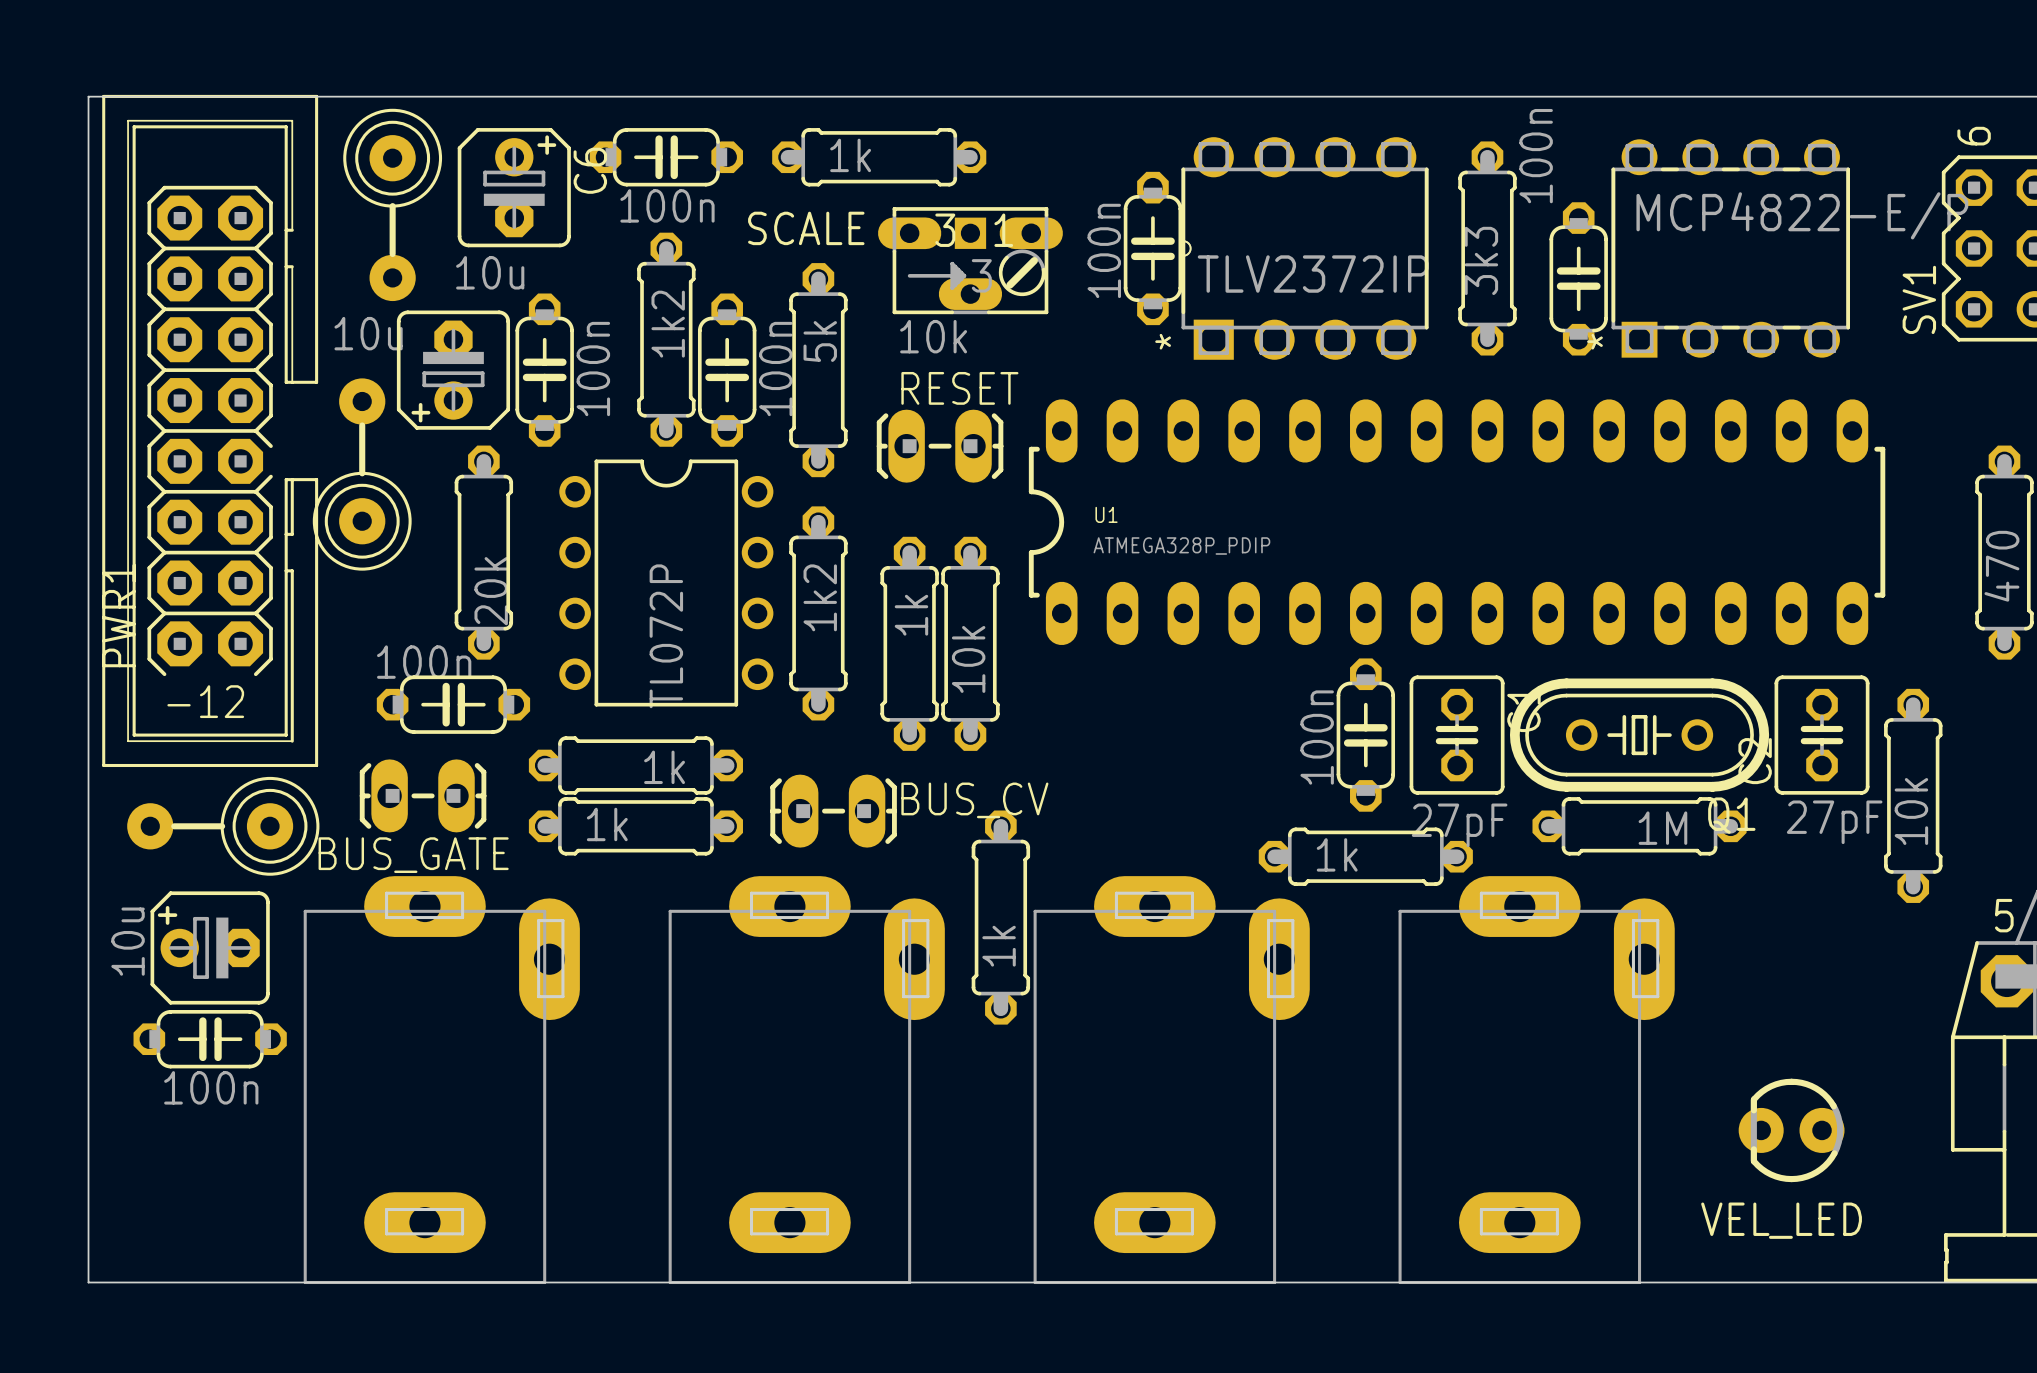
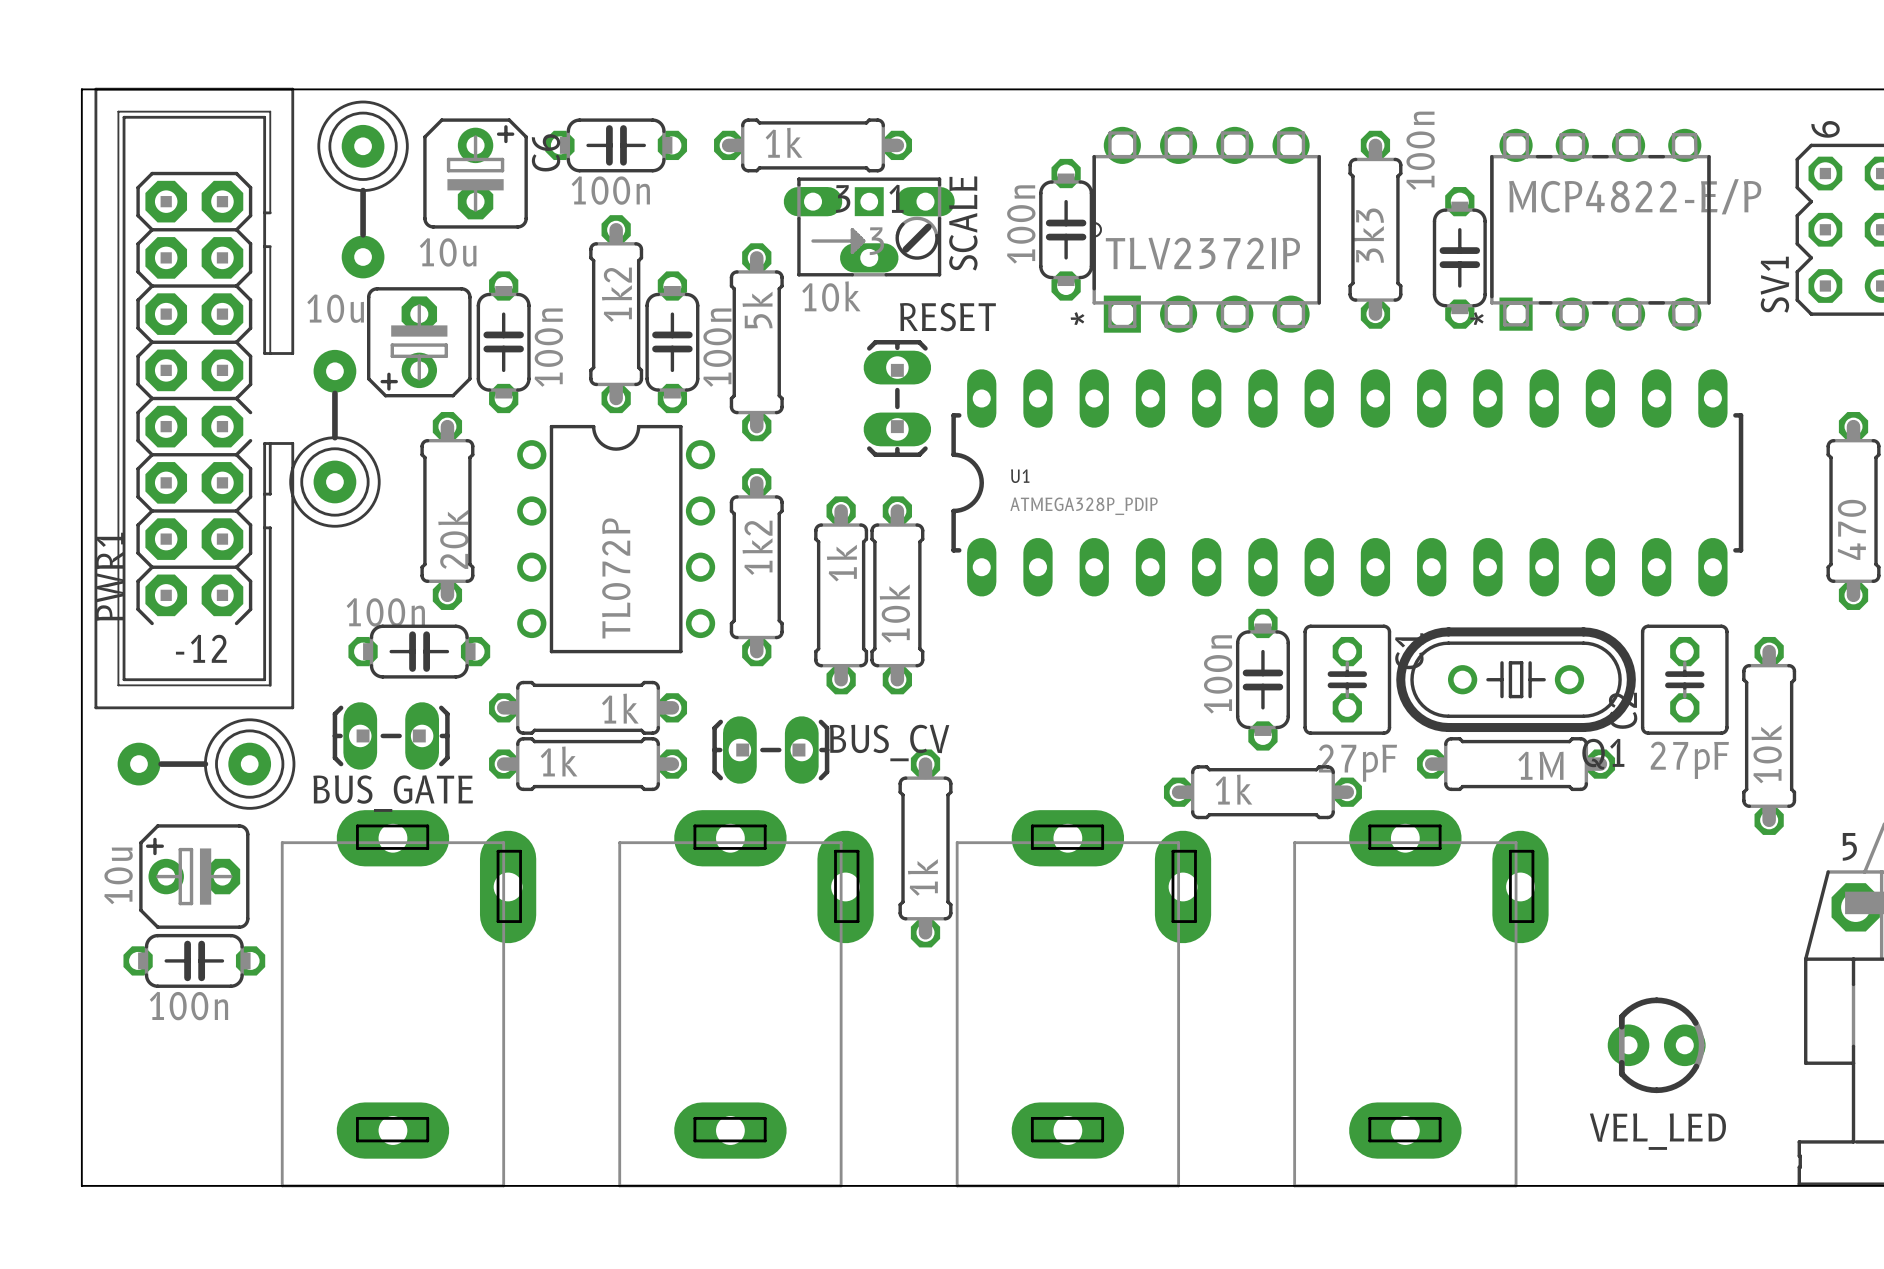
SCALE name rotation: 0° (806, 228) -> 90° counterclockwise (963, 223)
SCALE name position: SCALE (806, 228) -> SCALE (963, 223)
SCALE position: (970, 260) -> (869, 226)
RESET name position: RESET (959, 388) -> RESET (947, 317)
RESET rotation: 0° (940, 446) -> 90° clockwise (897, 398)

